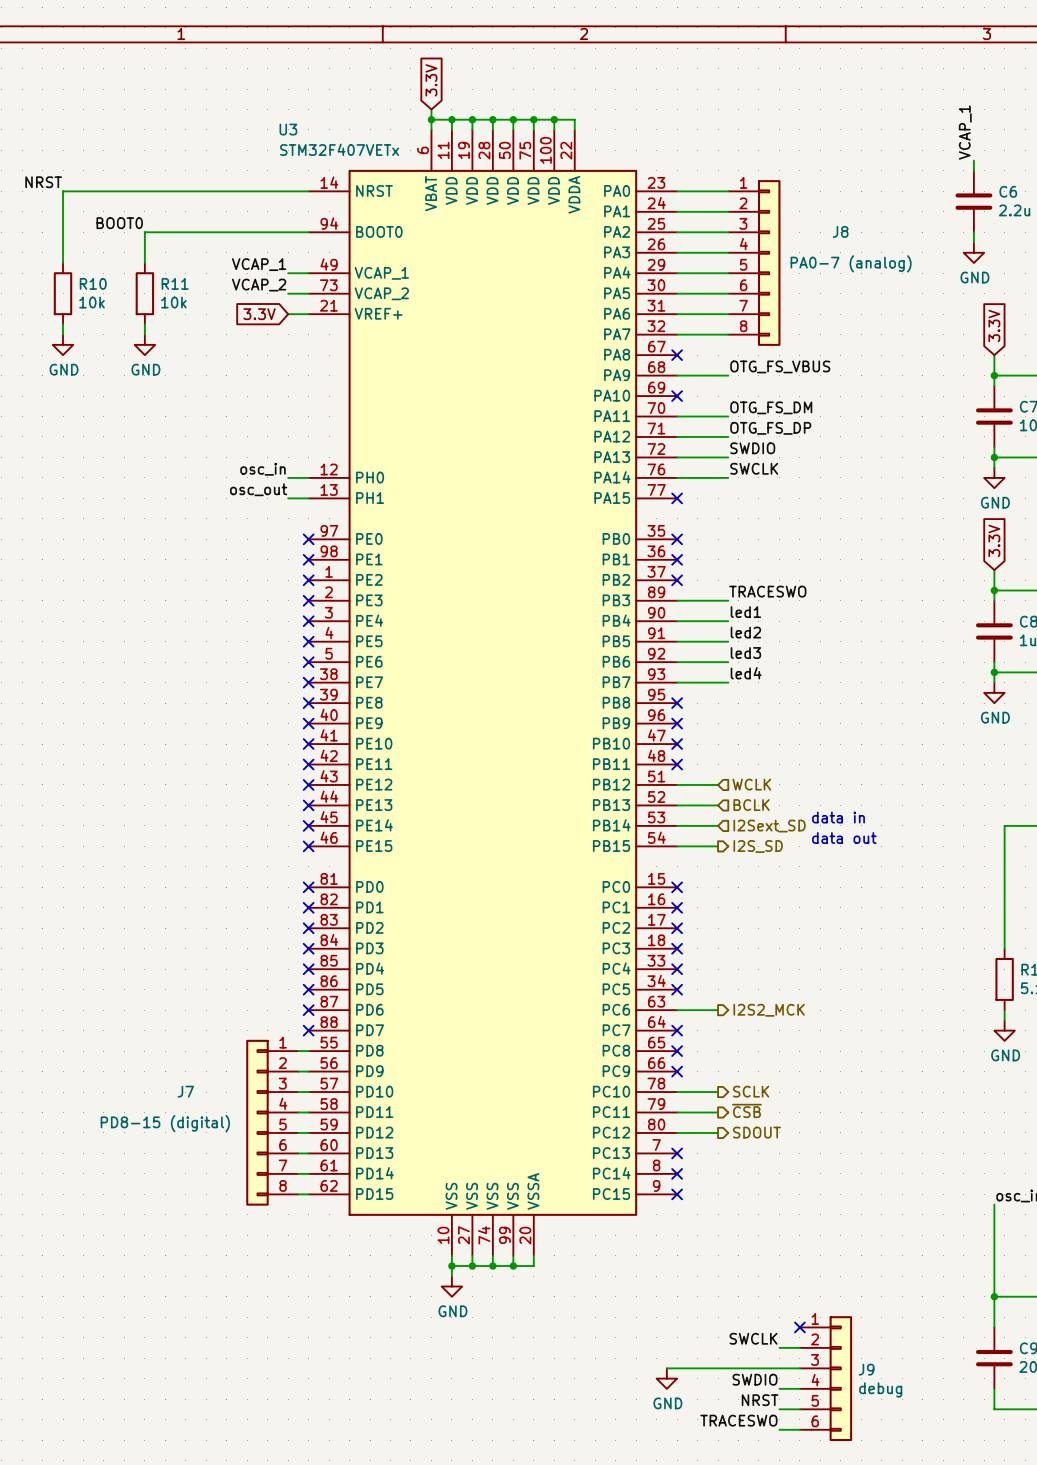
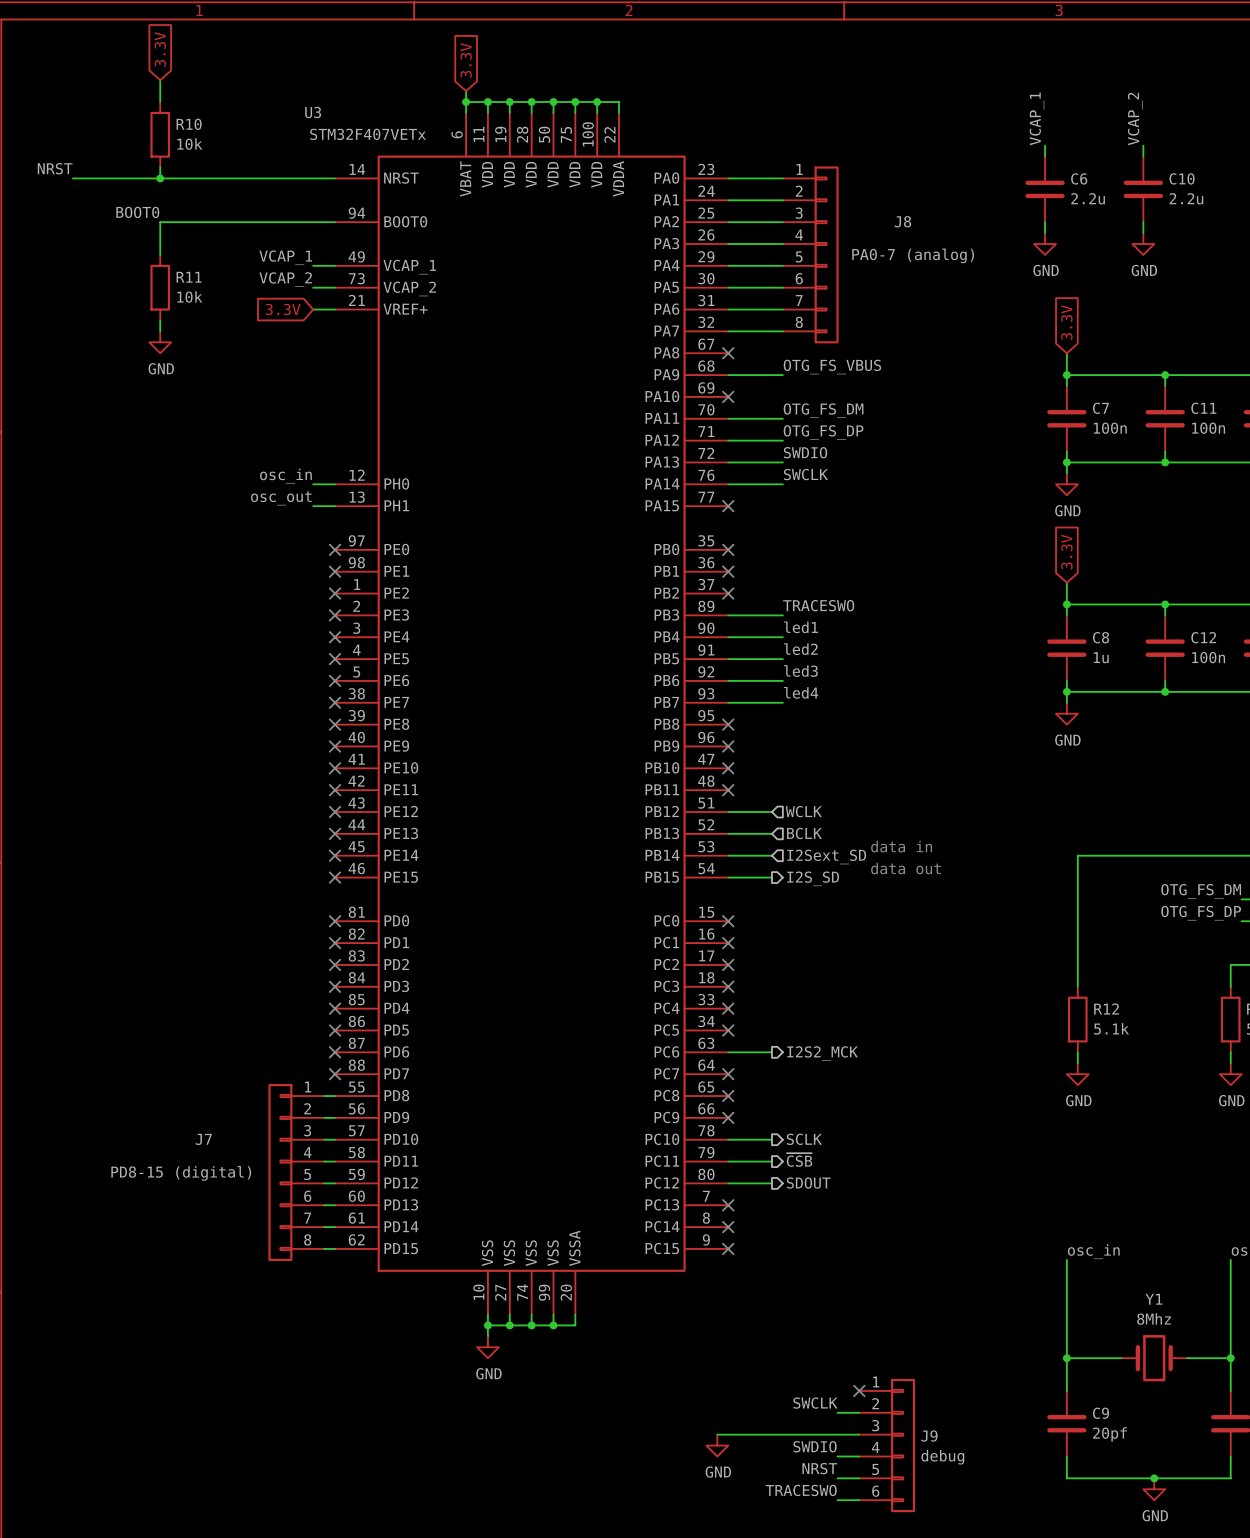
global label: none -> 3.3V (160, 49)
wire: none -> (160, 80) (160, 101)
wire: (63, 191) (63, 263) -> none
junction: none -> (160, 178)
R10 position: (63, 293) -> (160, 134)
wire: (63, 324) (63, 334) -> (160, 167) (160, 178)
power symbol: GND (63, 344) -> none

